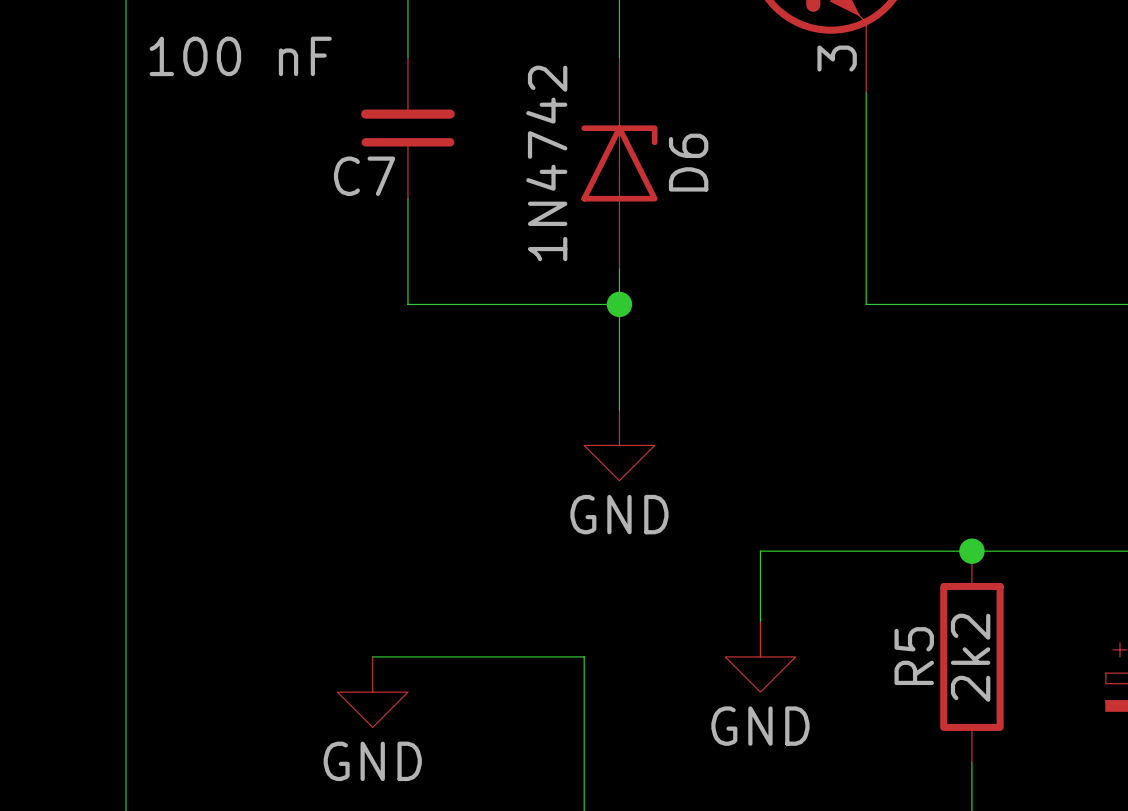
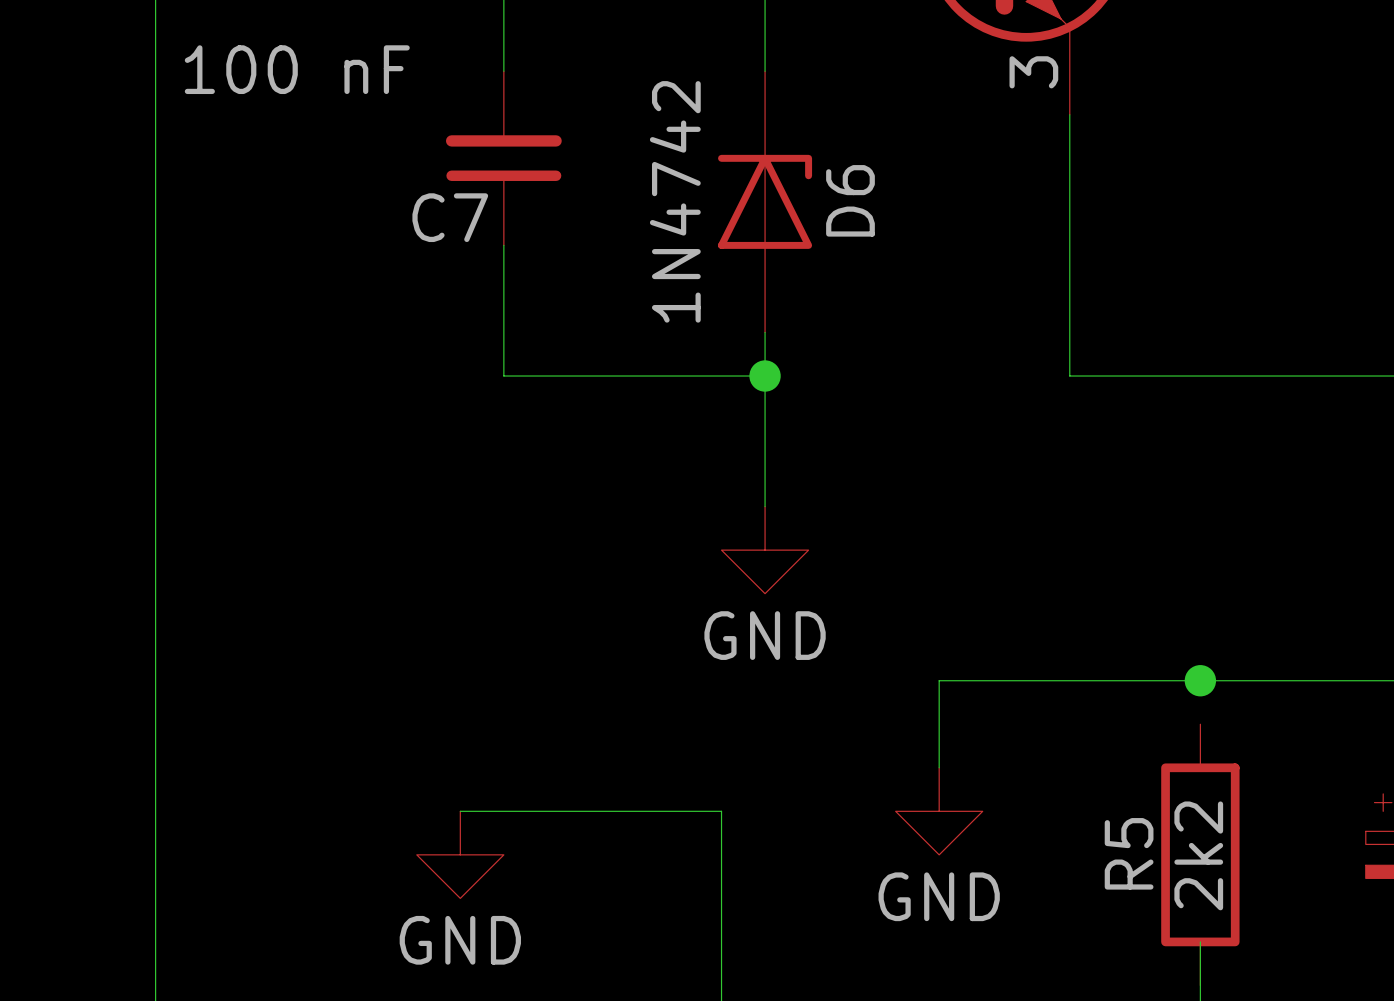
R5 position: (971, 656) -> (1200, 854)

